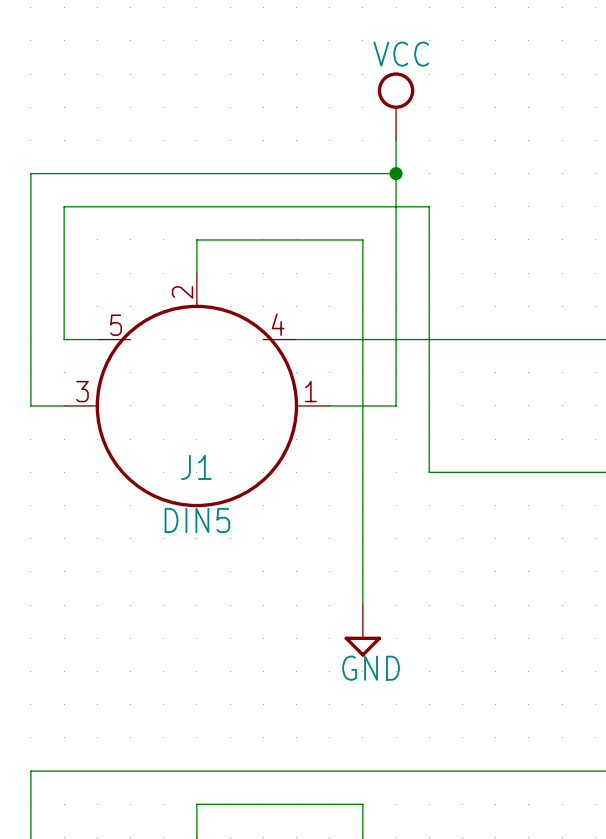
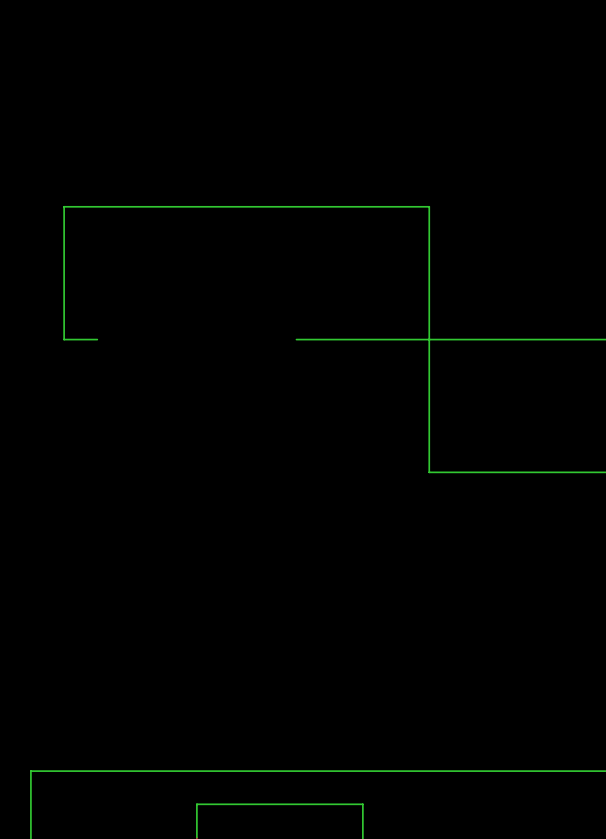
power symbol: VCC (396, 106) -> none
wire: (396, 140) (396, 405) (329, 405) -> none
wire: (396, 173) (30, 173) (30, 405) (64, 405) -> none
junction: (396, 173) -> none
wire: (196, 273) (196, 239) (362, 239) (362, 605) -> none
J1: DIN5 (196, 390) -> none
power symbol: GND (362, 630) -> none

